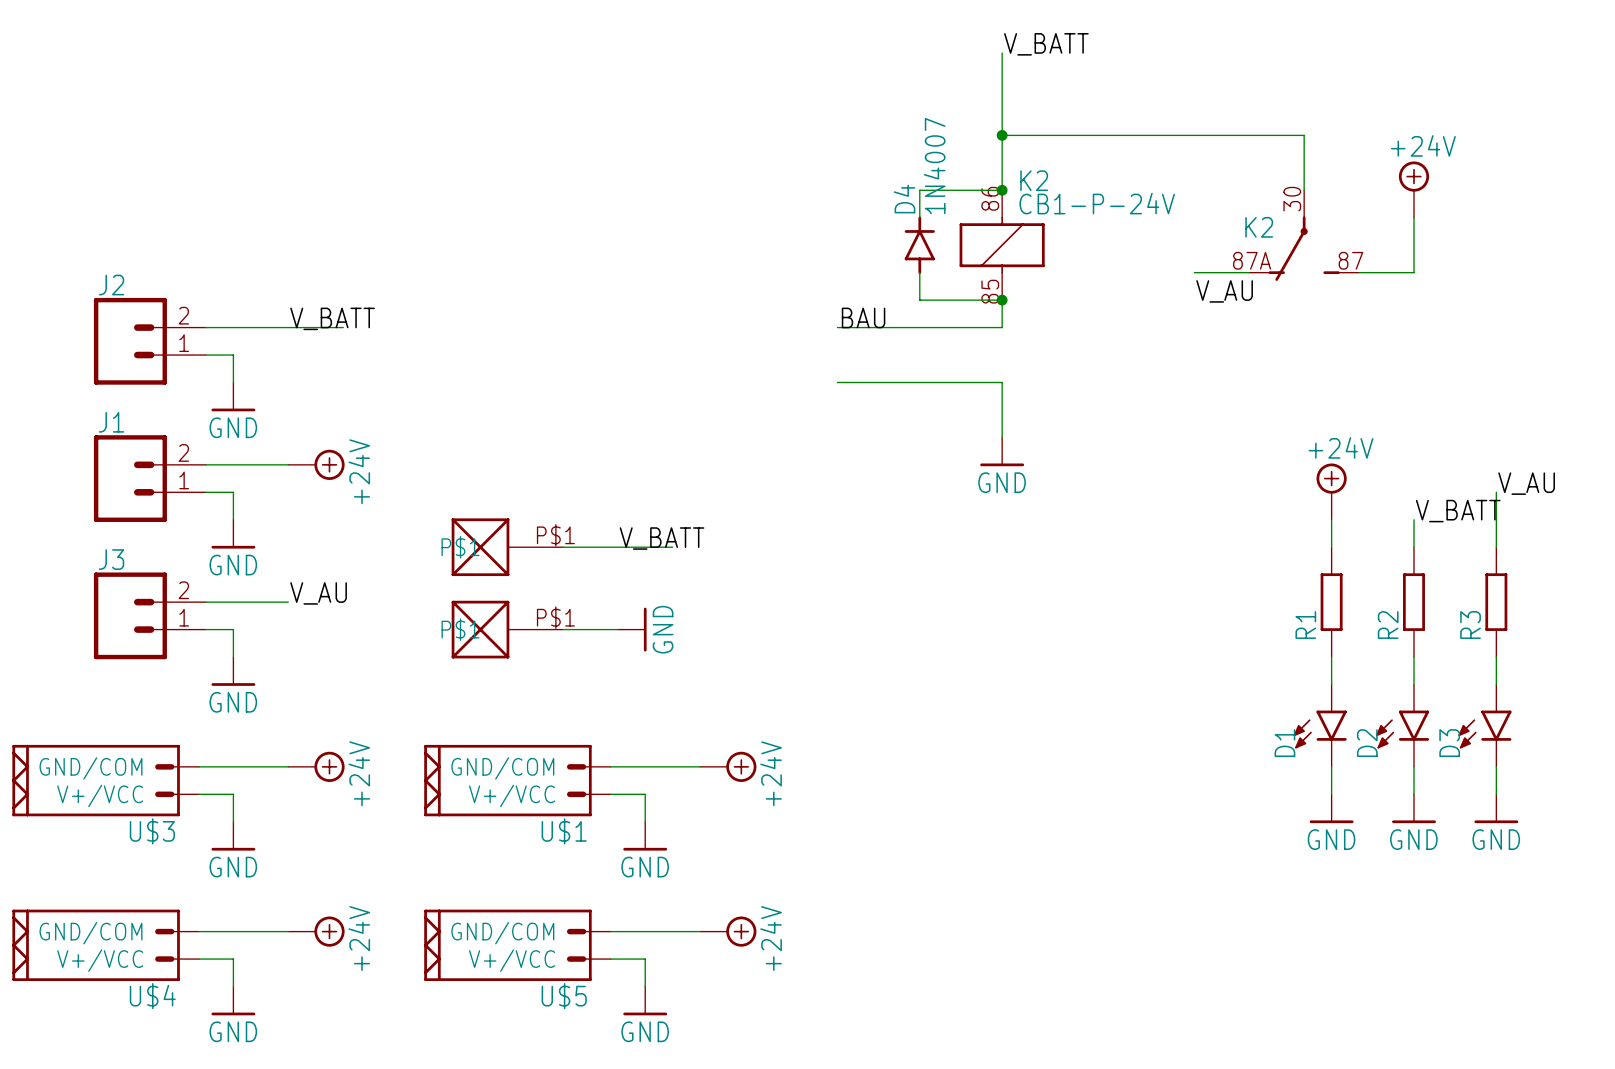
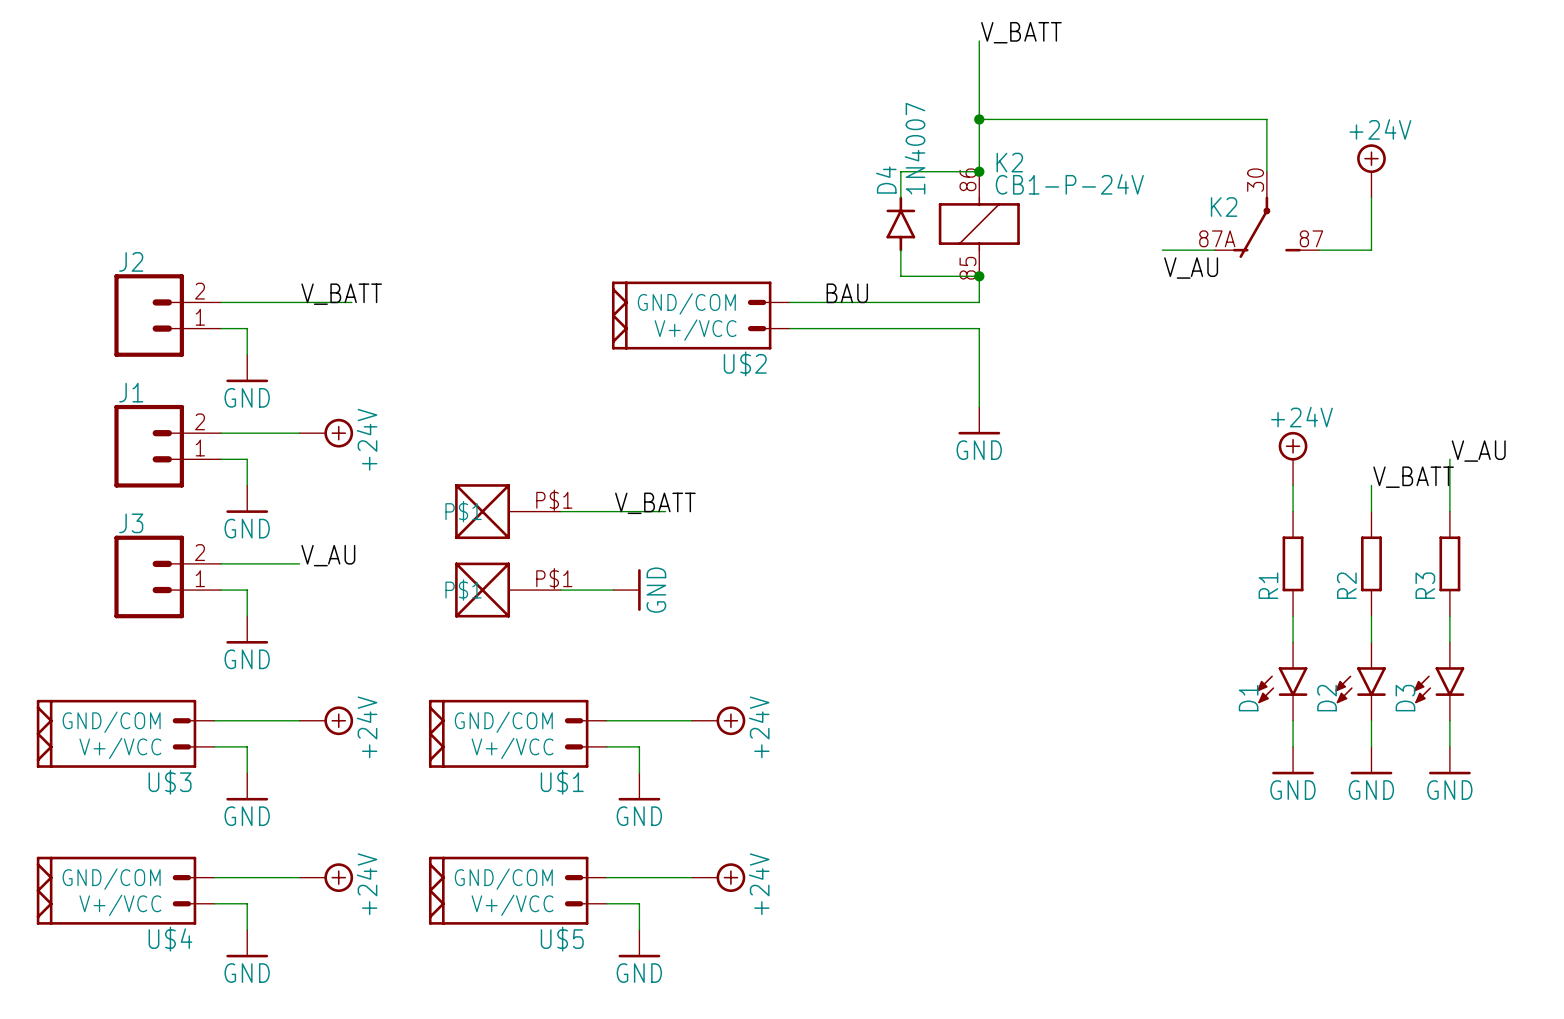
wire: none -> (789, 302) (822, 302)
U$2: none -> (700, 315)
wire: (837, 382) (1002, 382) -> (789, 328) (979, 328) (979, 354)

